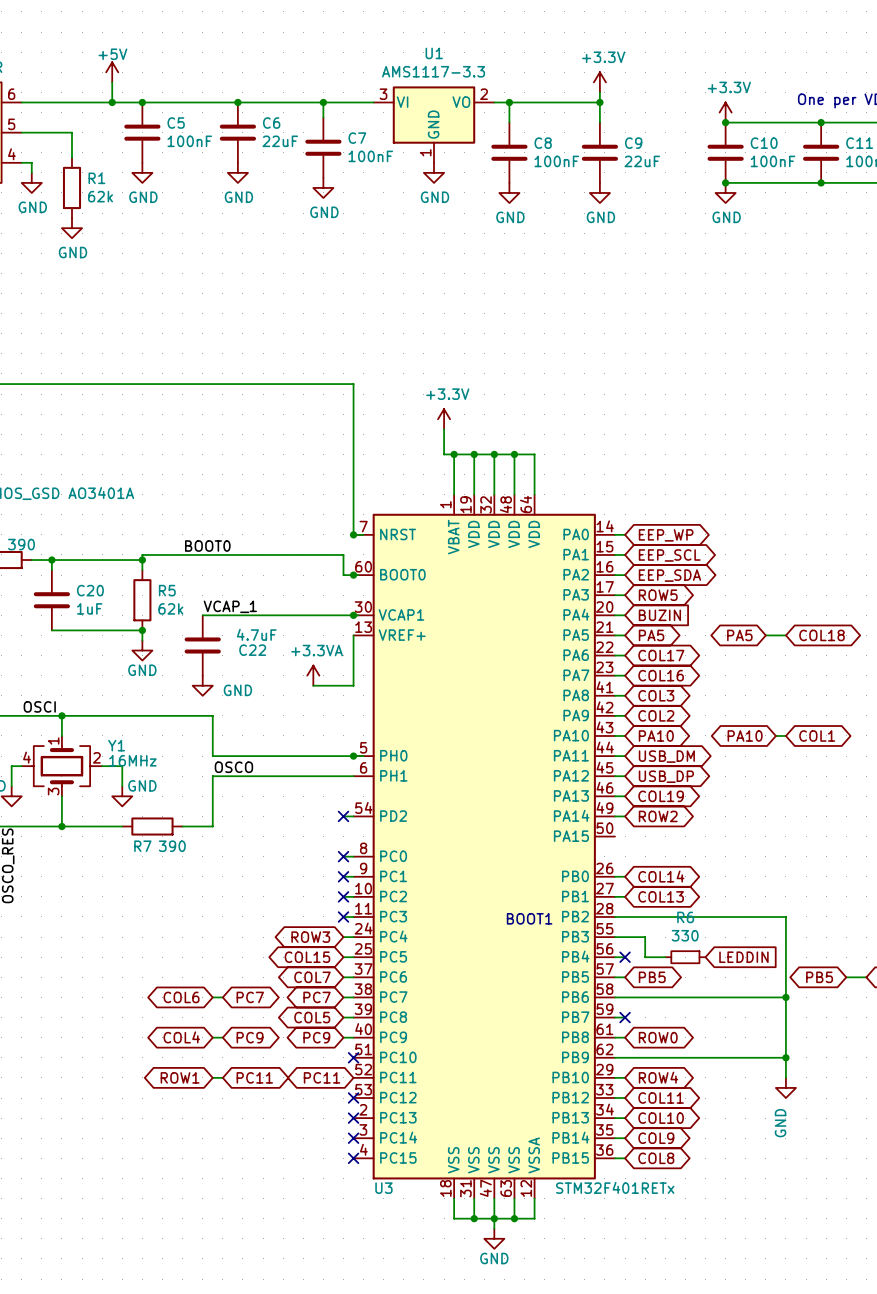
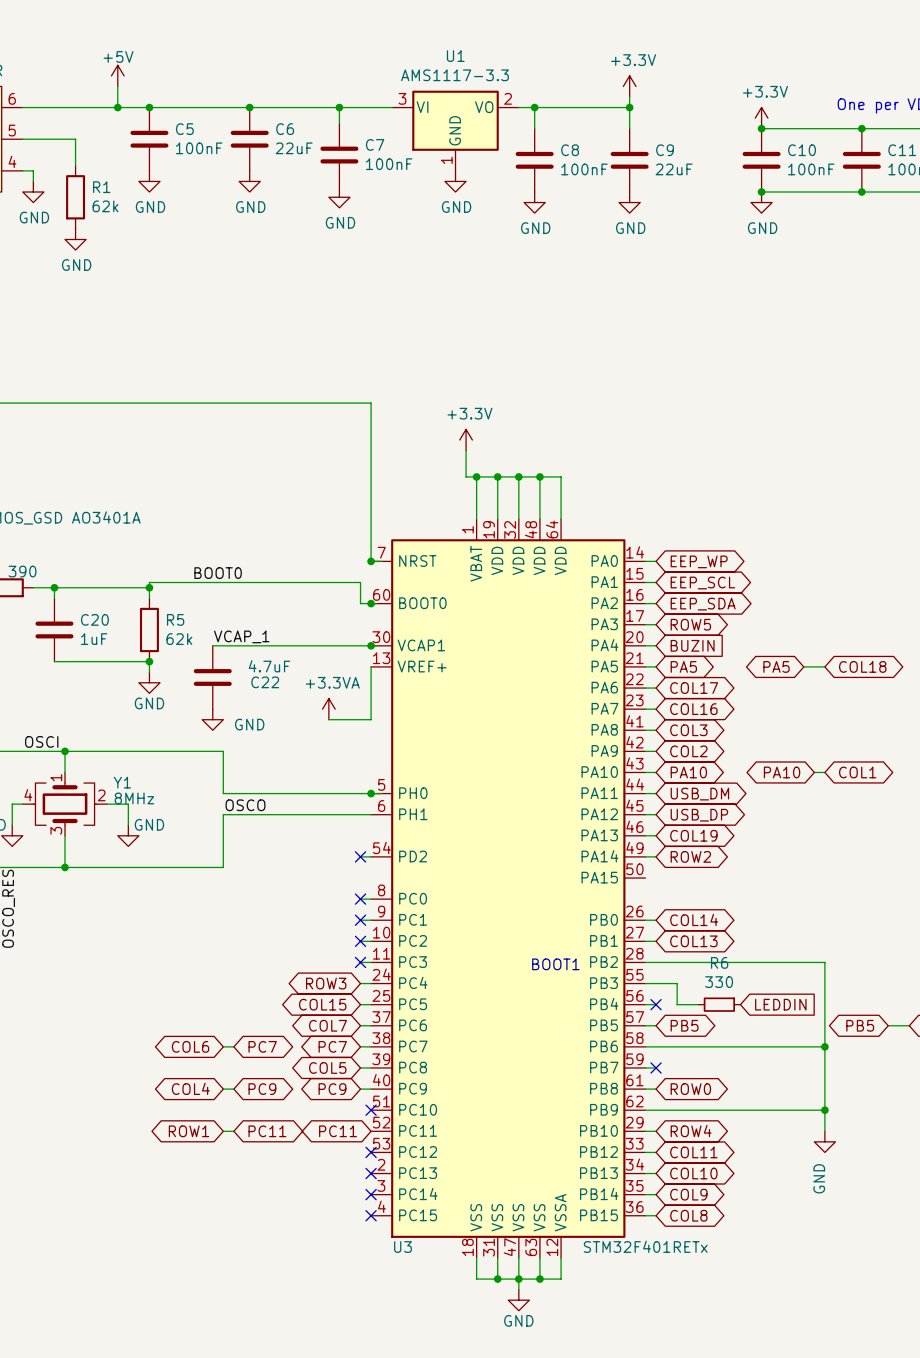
Y1 value: 16MHz (132, 760) -> 8MHz (134, 798)
wire: none -> (128, 867) (191, 867)
R7: 390 (152, 826) -> none

